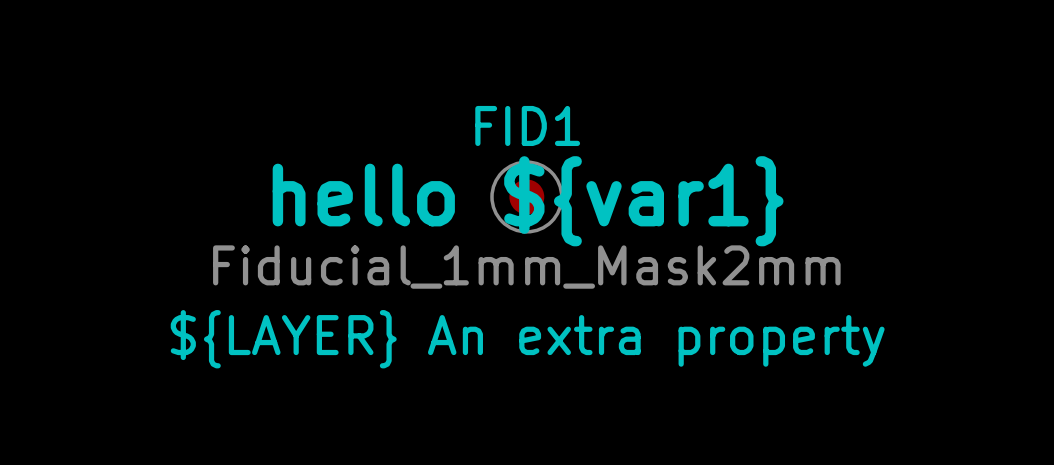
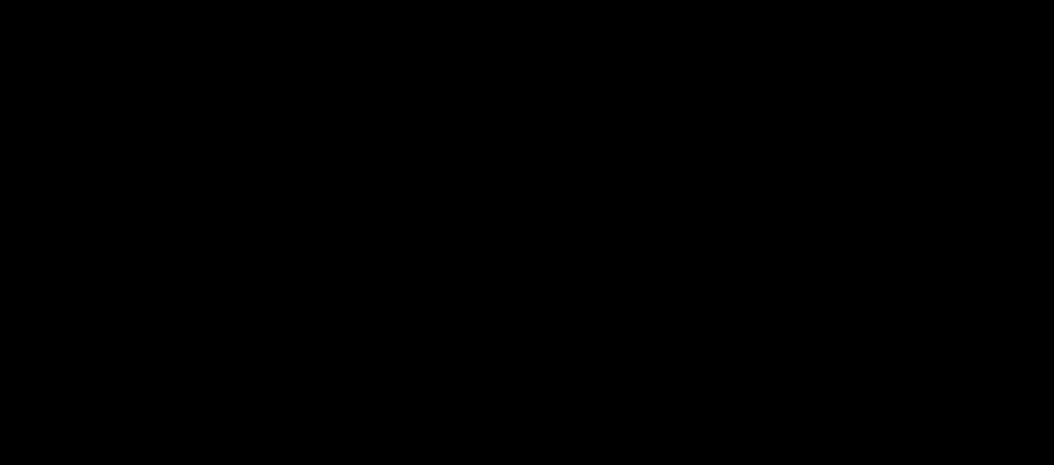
FID1: Fiducial_1mm_Mask2mm (526, 196) -> none
text: hello ${var1} (528, 201) -> none

